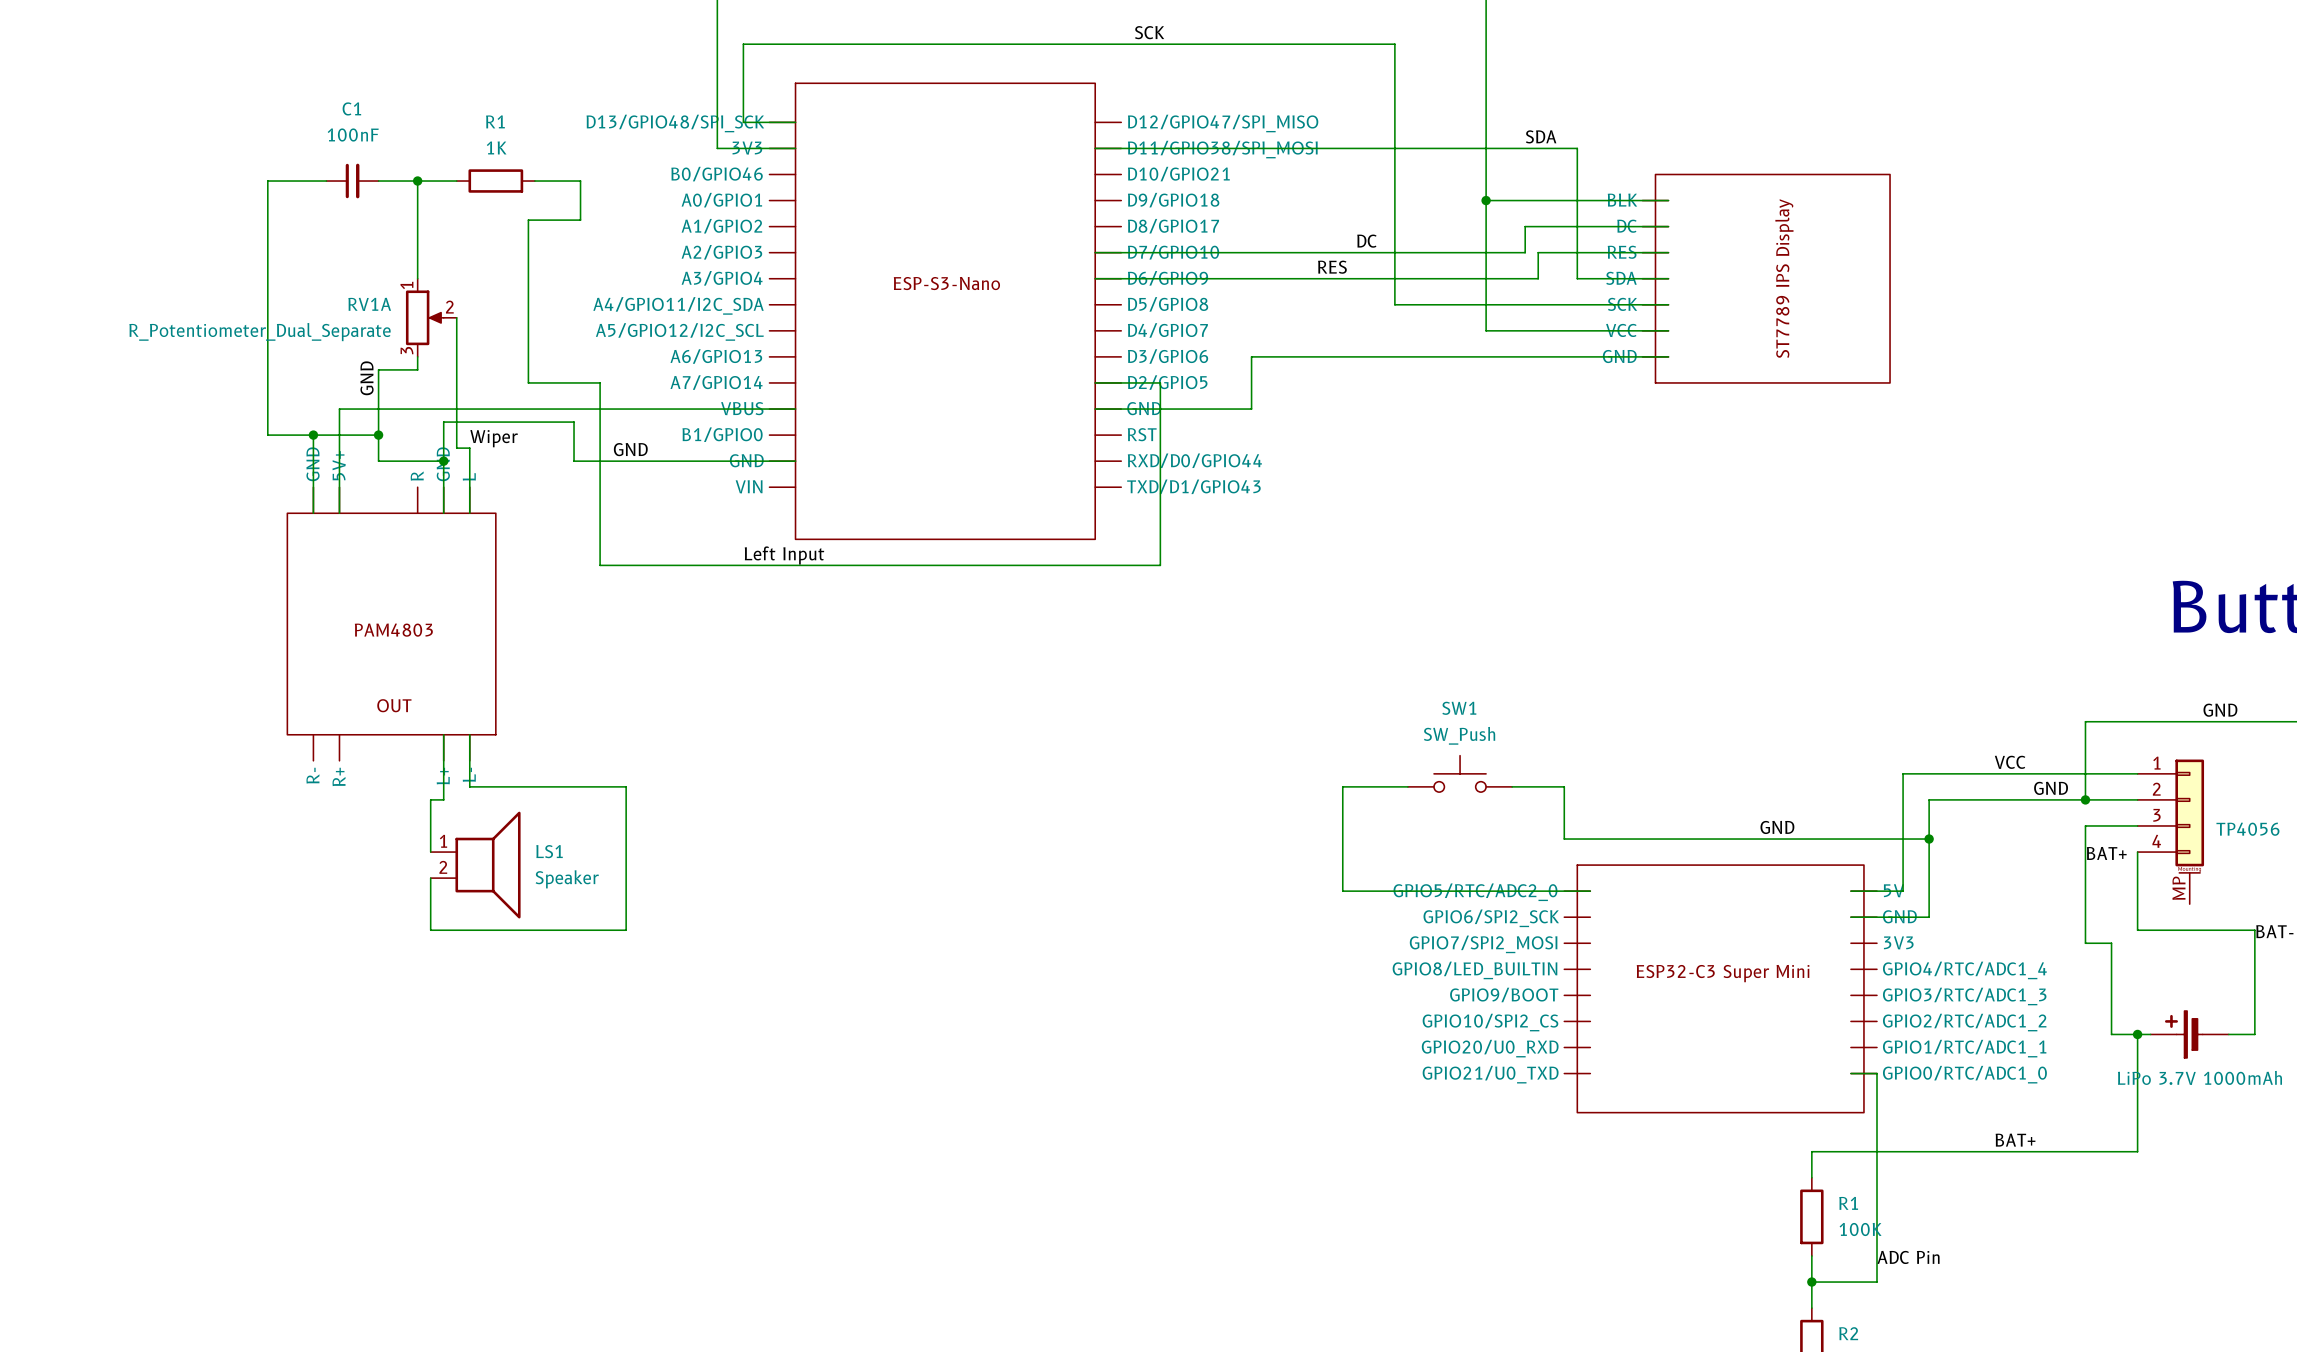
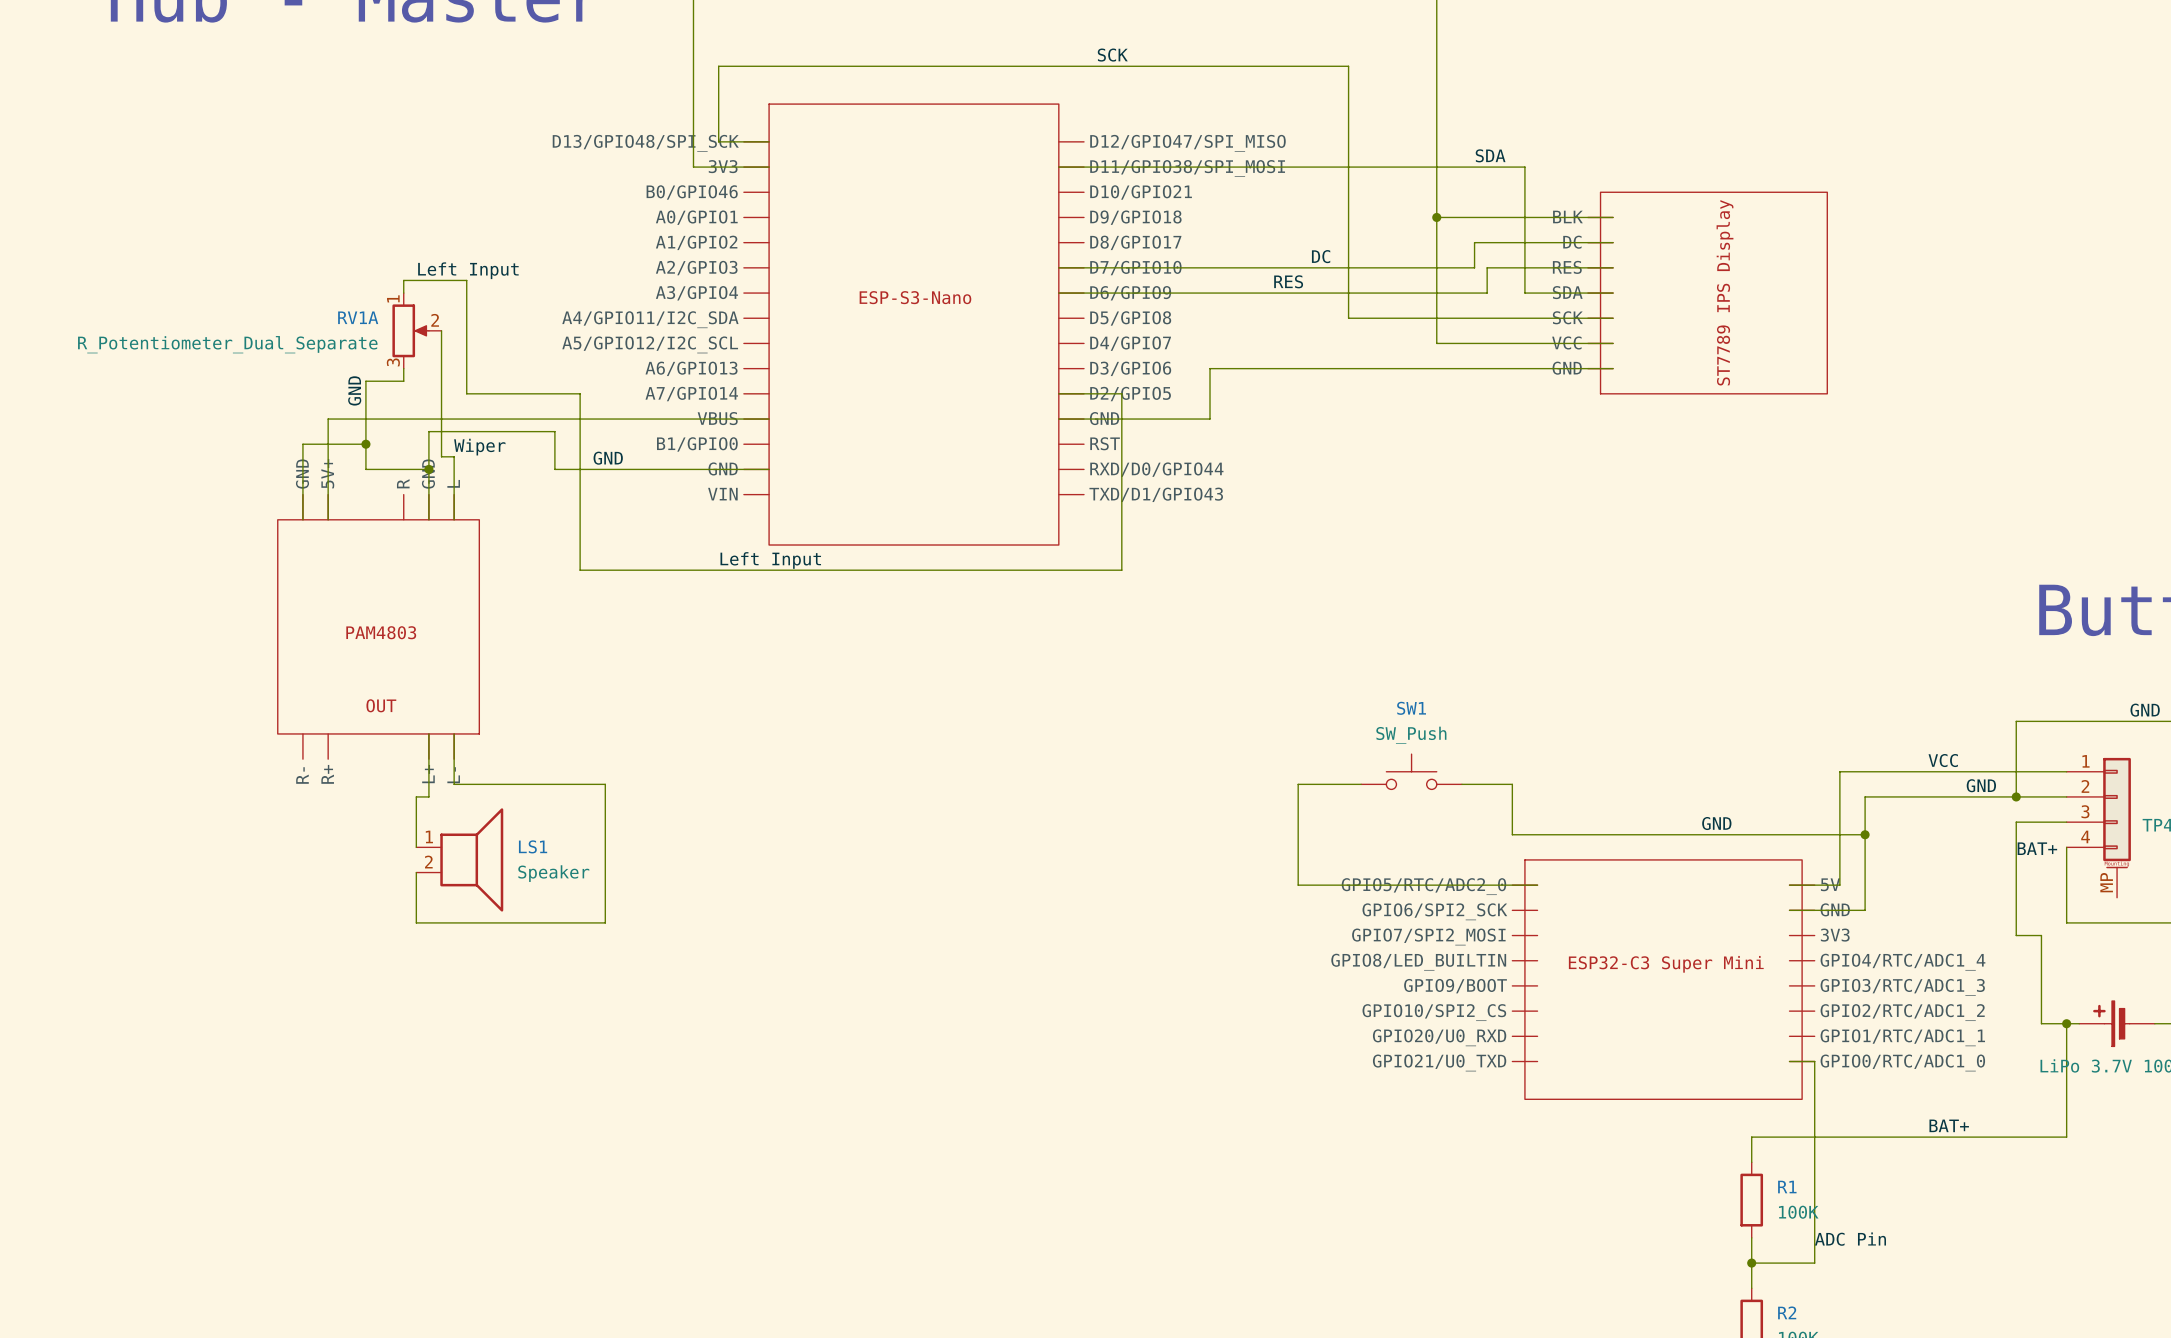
wire: (326, 181) (267, 181) (267, 435) (313, 435) -> none
C1: 100nF (352, 181) -> none
wire: (378, 181) (456, 181) -> none
wire: (417, 181) (417, 265) -> none
junction: (417, 181) -> none
R1: 1K (495, 181) -> none
wire: (534, 181) (580, 181) (580, 220) (528, 220) (528, 382) -> (403, 280) (466, 280) (466, 393) (510, 393)
label: none -> Left Input (468, 270)
junction: (313, 435) -> none

